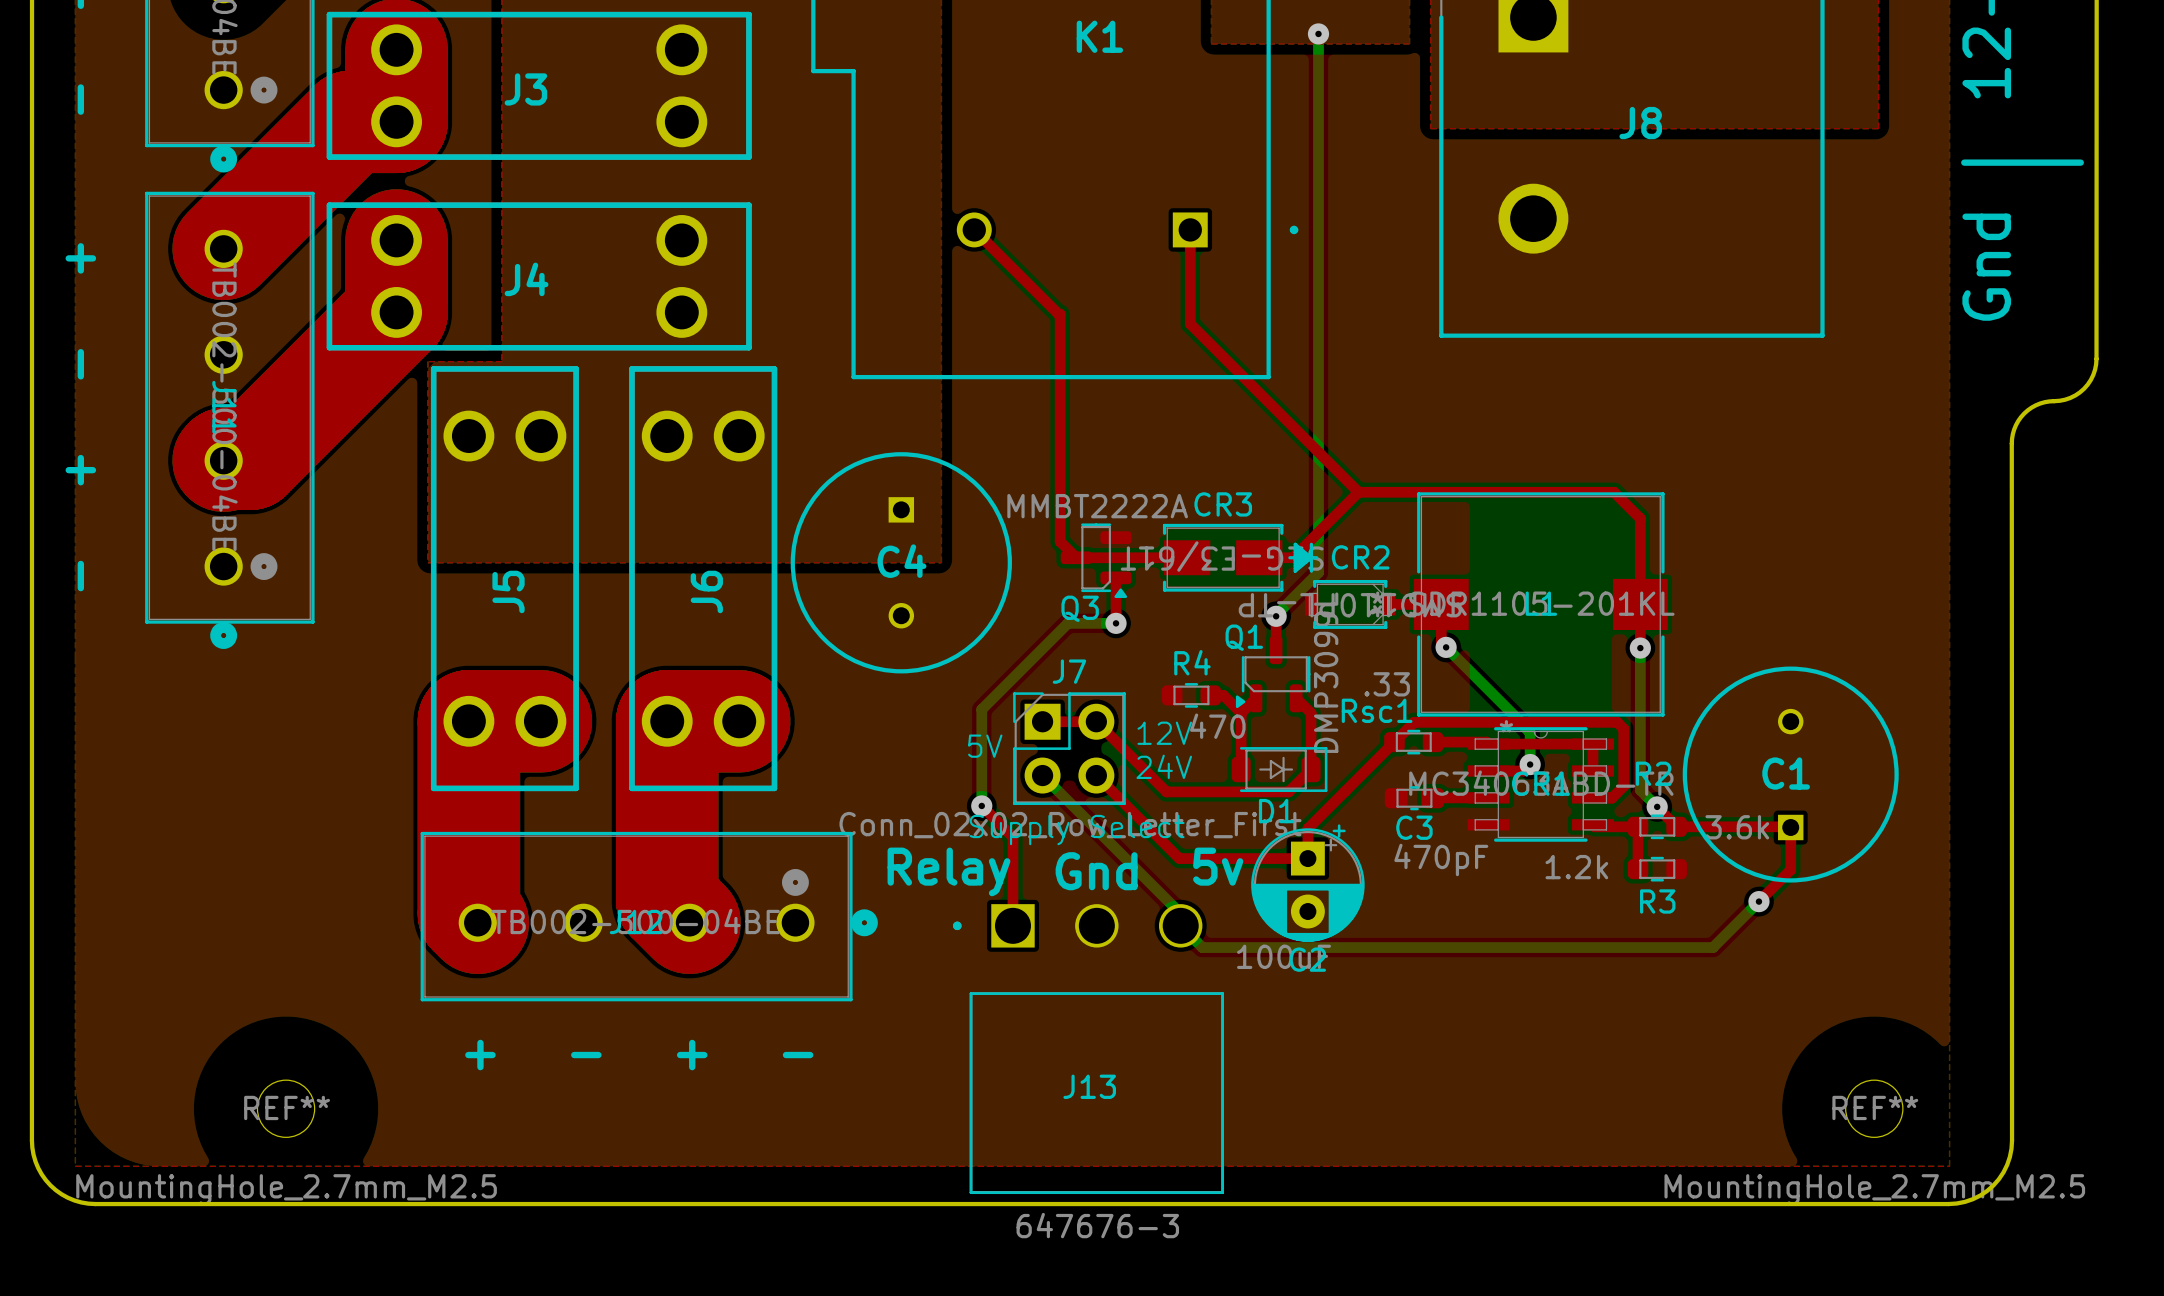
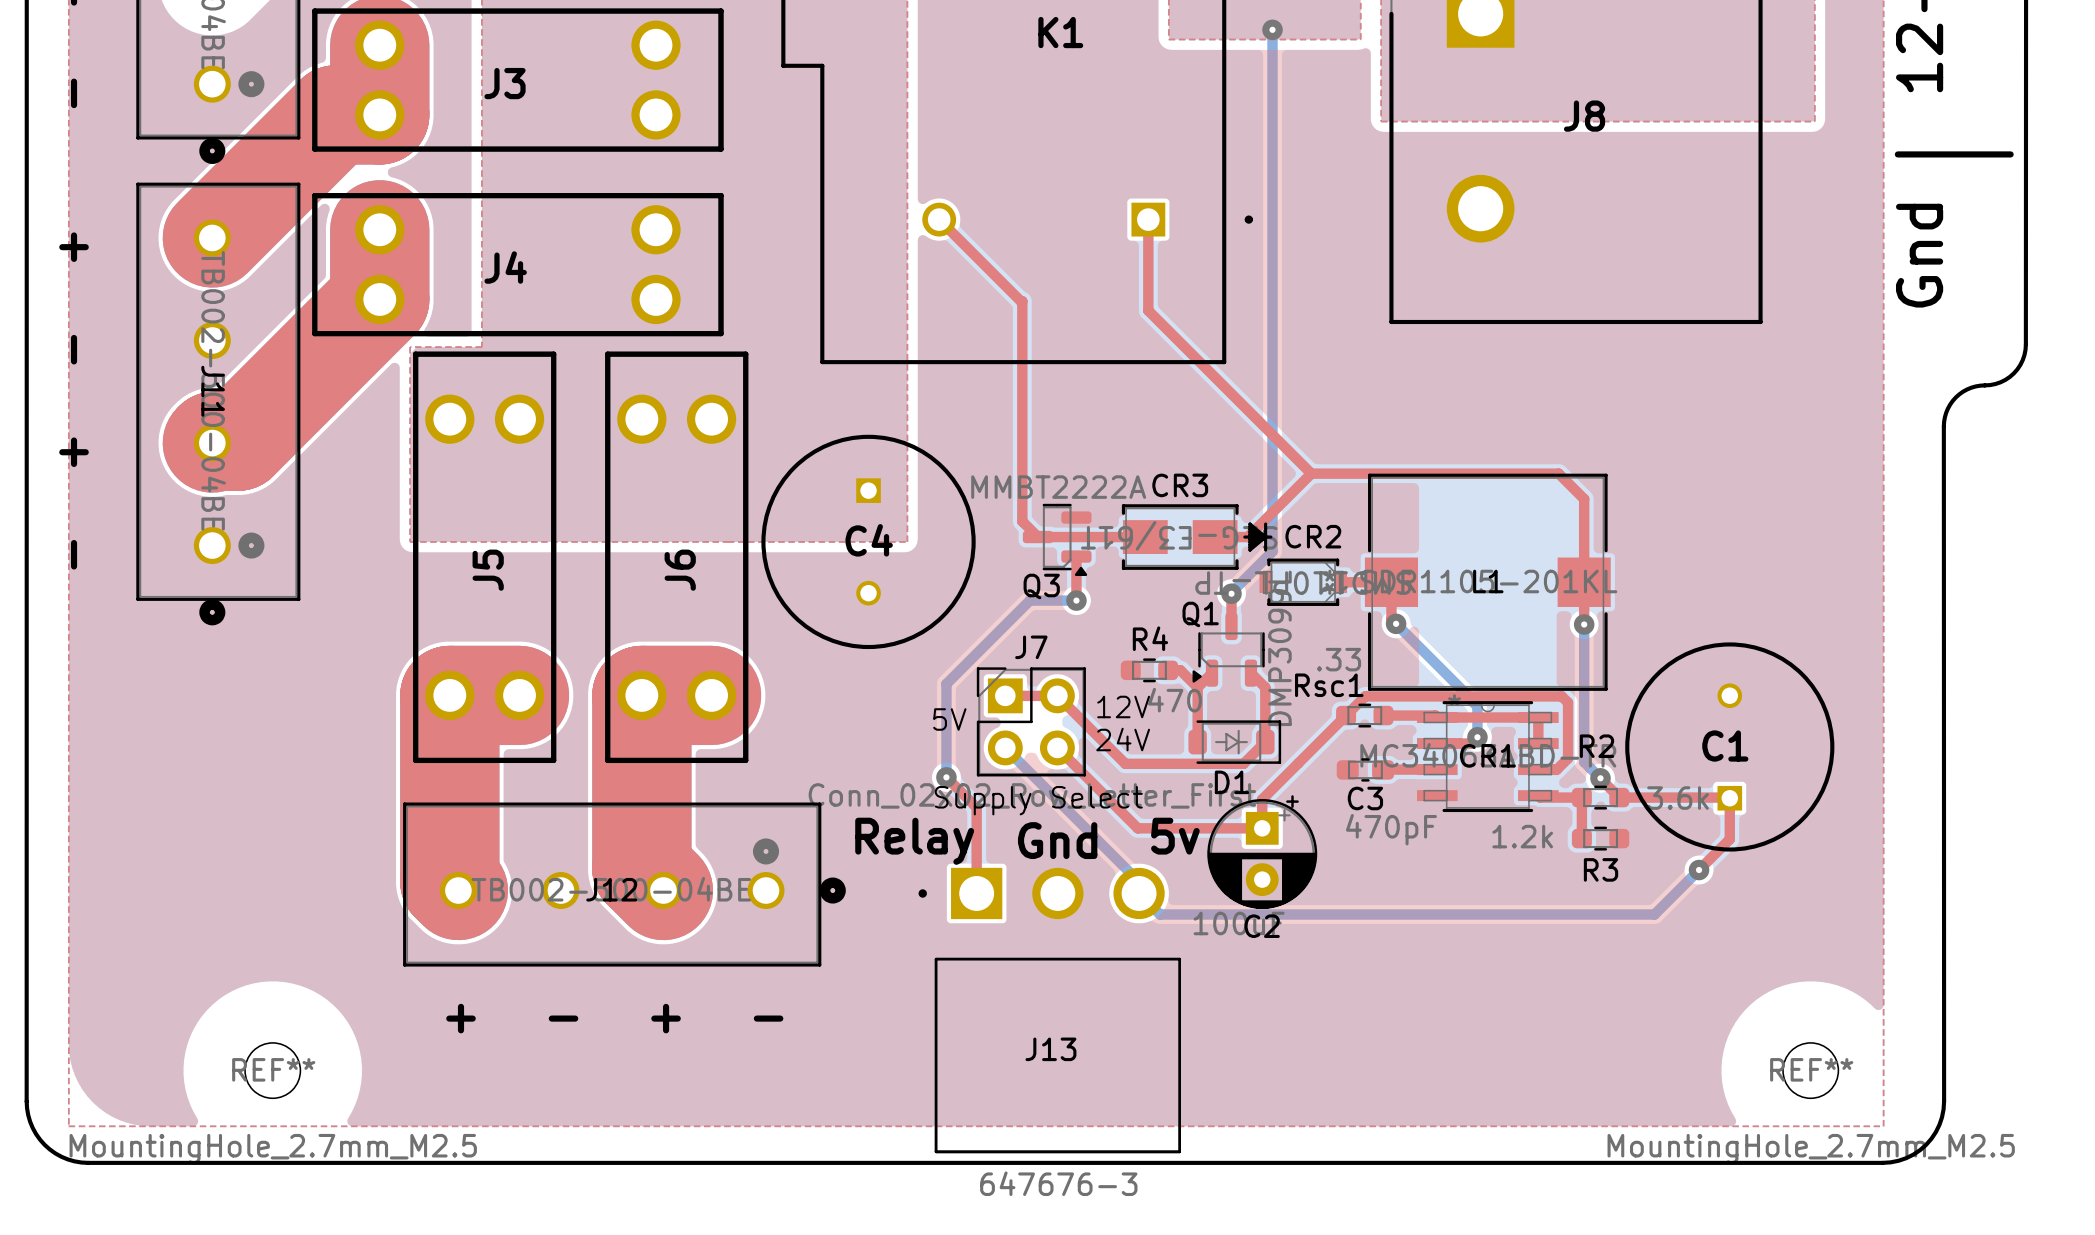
J13 footprint: [953, 904, 1224, 1195] -> [918, 867, 1181, 1154]

